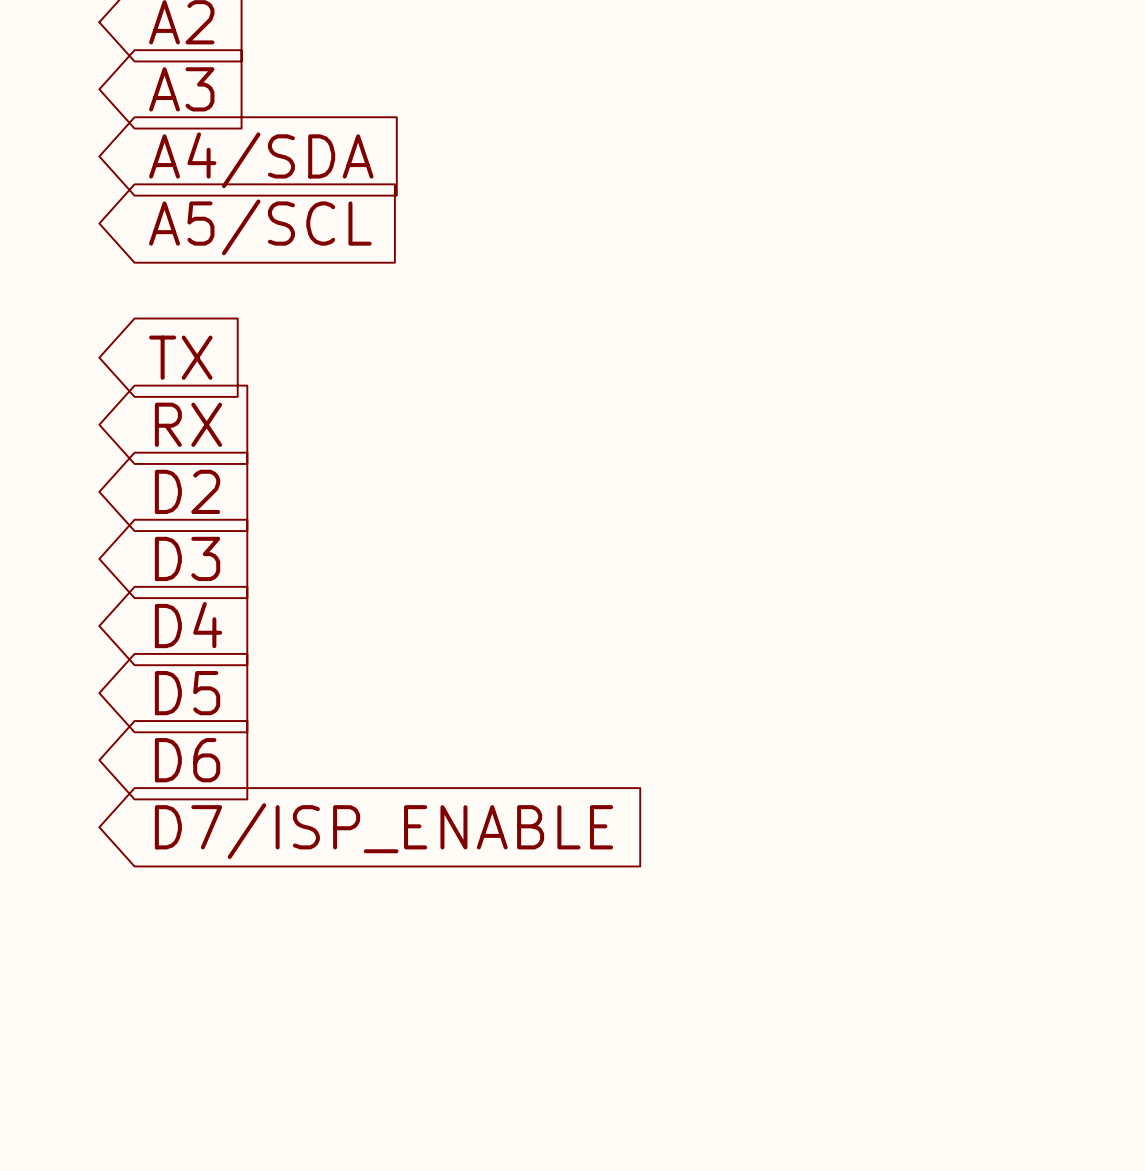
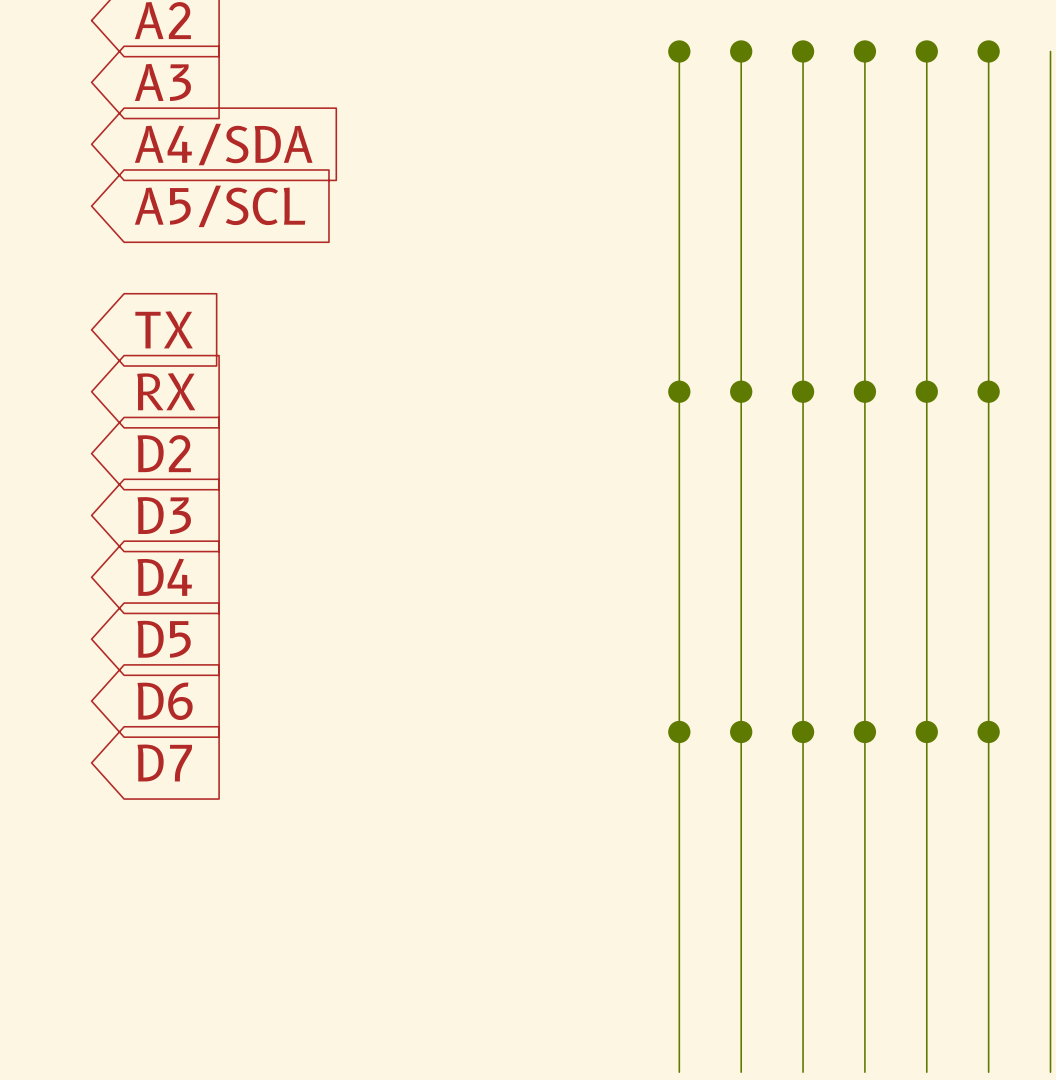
wire: none -> (679, 51) (679, 1072)
junction: none -> (679, 51)
wire: none -> (741, 51) (741, 1072)
junction: none -> (741, 51)
wire: none -> (803, 51) (803, 1072)
junction: none -> (803, 51)
wire: none -> (864, 51) (864, 1072)
junction: none -> (864, 51)
wire: none -> (926, 51) (926, 1072)
junction: none -> (926, 51)
wire: none -> (988, 51) (988, 1072)
junction: none -> (988, 51)
wire: none -> (1050, 51) (1050, 1072)
junction: none -> (679, 391)
junction: none -> (741, 391)
junction: none -> (803, 391)
junction: none -> (864, 391)
junction: none -> (926, 391)
junction: none -> (988, 391)
junction: none -> (679, 731)
junction: none -> (741, 731)
junction: none -> (803, 731)
junction: none -> (864, 731)
junction: none -> (926, 731)
junction: none -> (988, 731)
global label: D7/ISP_ENABLE (383, 831) -> D7 (164, 763)

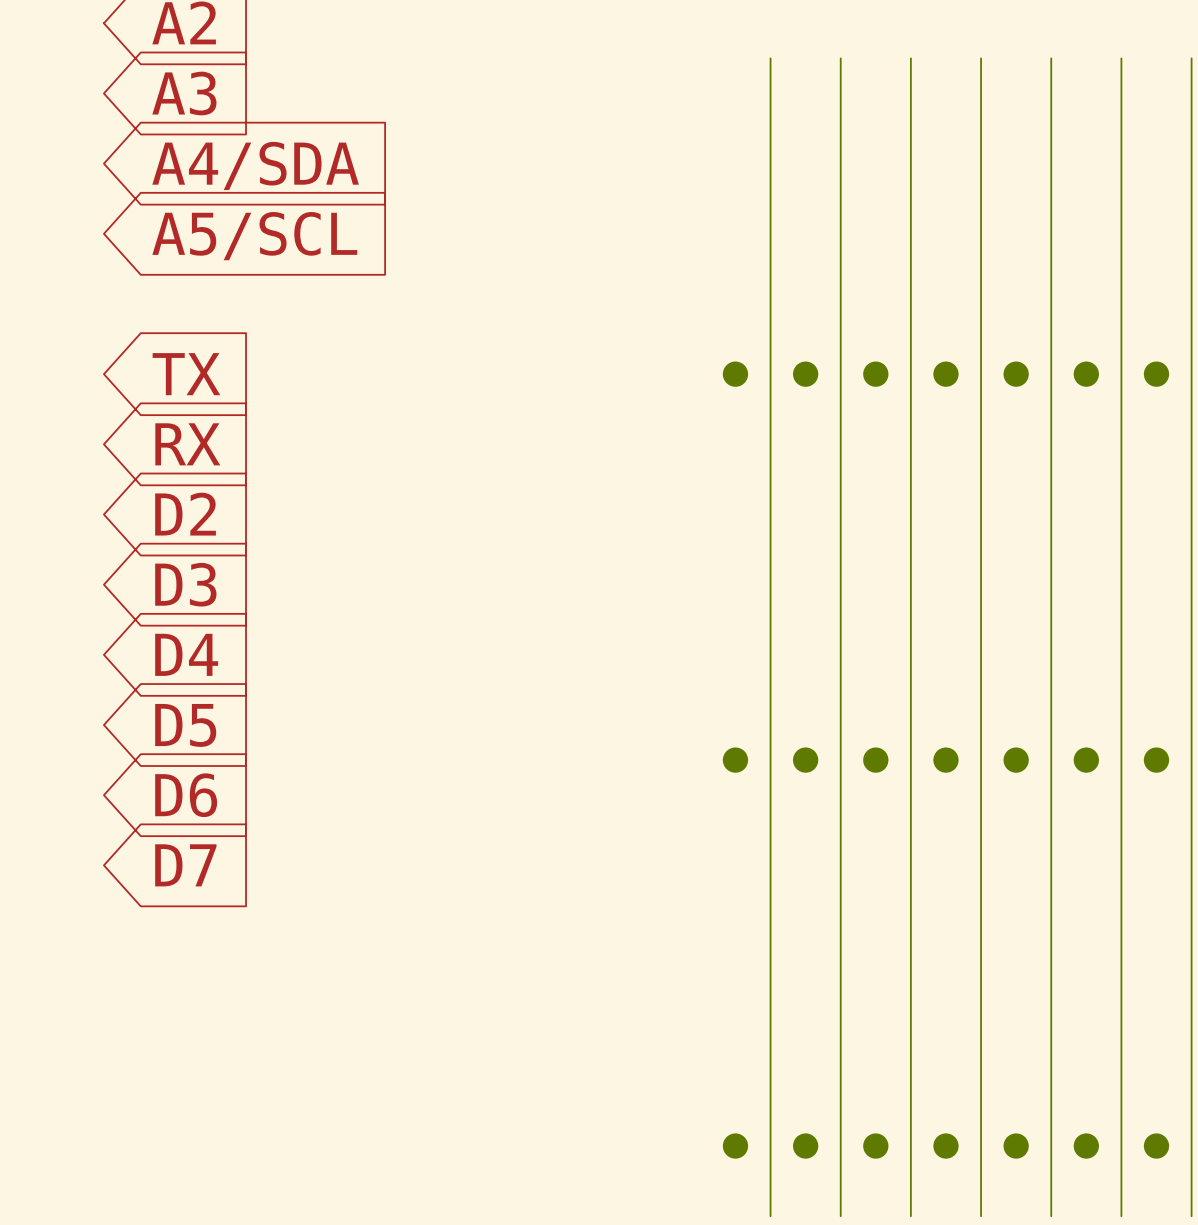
junction: (679, 51) -> none
junction: (741, 51) -> none
junction: (803, 51) -> none
junction: (864, 51) -> none
junction: (926, 51) -> none
junction: (988, 51) -> none
junction: none -> (735, 374)
junction: none -> (805, 374)
junction: none -> (875, 374)
junction: none -> (945, 374)
junction: none -> (1016, 374)
junction: none -> (1086, 374)
junction: none -> (1156, 374)
junction: (679, 391) -> none
junction: (741, 391) -> none
junction: (803, 391) -> none
junction: (864, 391) -> none
junction: (926, 391) -> none
junction: (988, 391) -> none
junction: none -> (735, 760)
junction: none -> (805, 760)
junction: none -> (875, 760)
junction: none -> (945, 760)
junction: none -> (1016, 760)
junction: none -> (1086, 760)
junction: none -> (1156, 760)
junction: (679, 731) -> none
junction: (741, 731) -> none
junction: (803, 731) -> none
junction: (864, 731) -> none
junction: (926, 731) -> none
junction: (988, 731) -> none
junction: none -> (735, 1146)
junction: none -> (805, 1146)
junction: none -> (875, 1146)
junction: none -> (945, 1146)
junction: none -> (1016, 1146)
junction: none -> (1086, 1146)
junction: none -> (1156, 1146)

